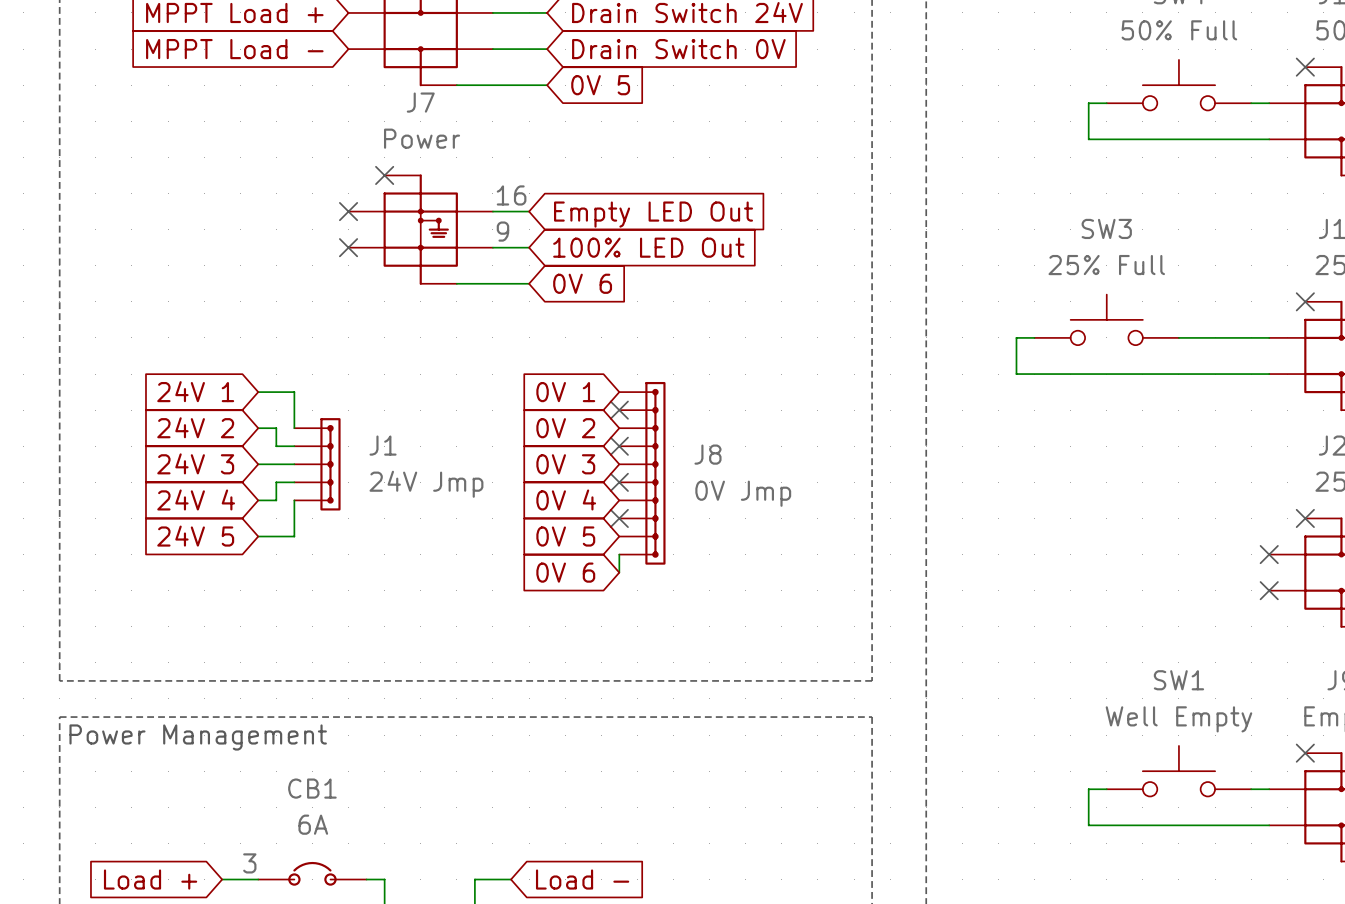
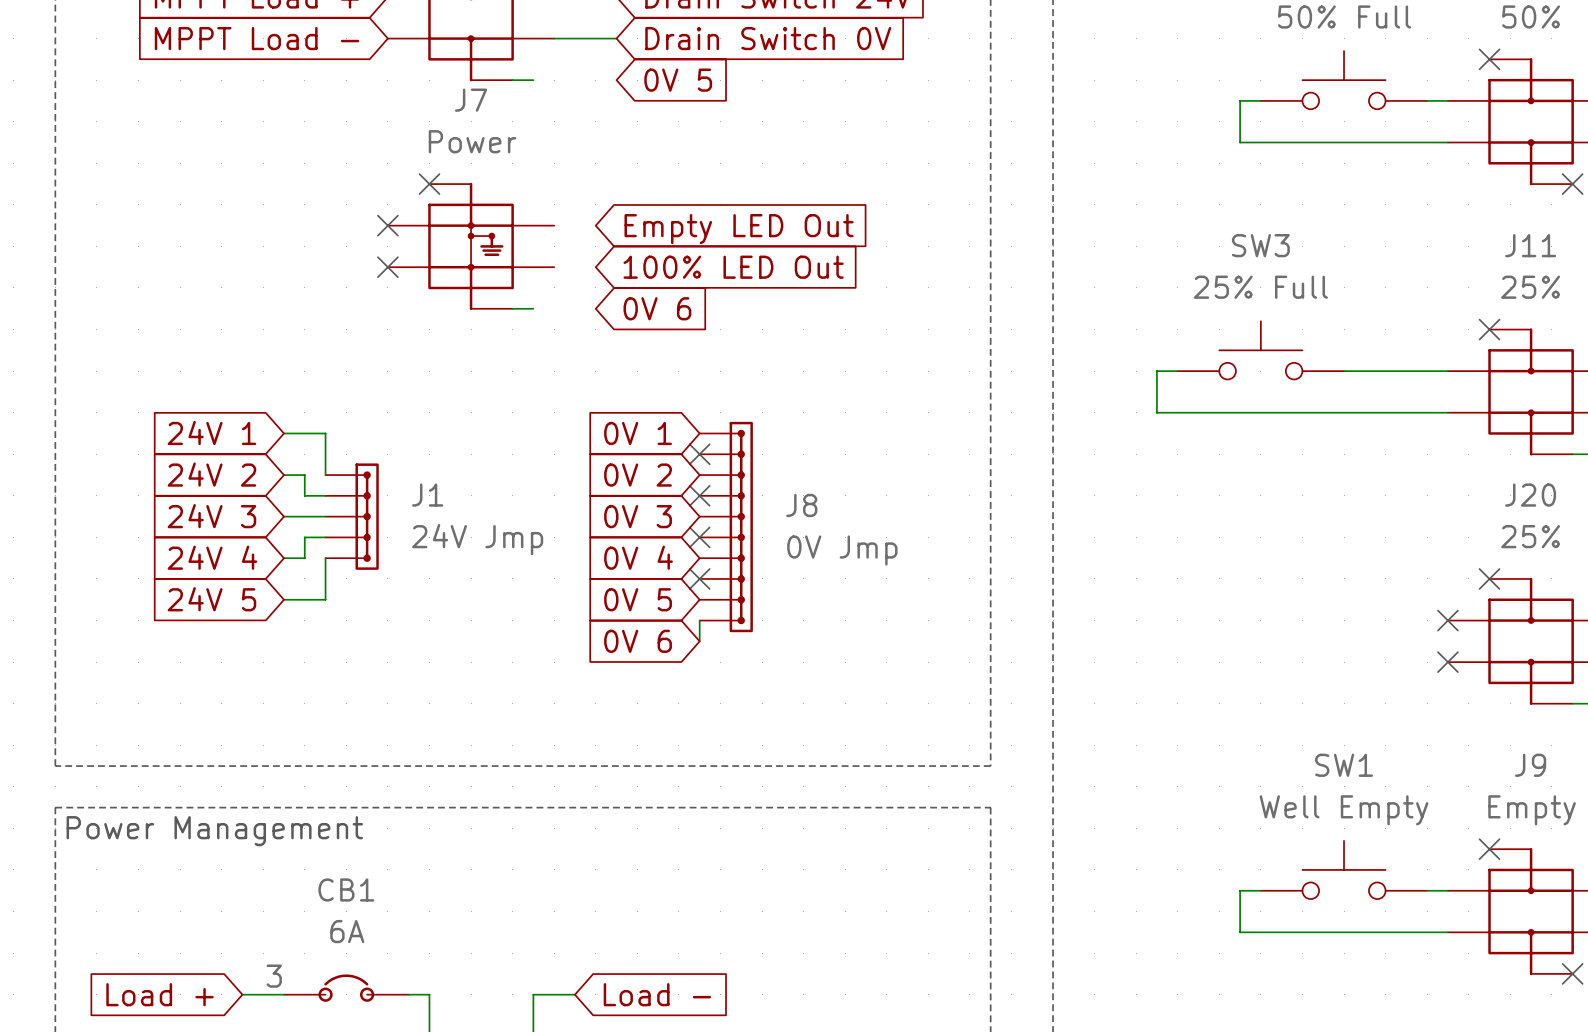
wire: (474, 85) (547, 85) -> none
label: 16 (511, 195) -> none
wire: (492, 211) (529, 211) -> none
label: 9 (502, 231) -> none
wire: (492, 247) (529, 247) -> none
wire: (474, 283) (529, 283) -> none

